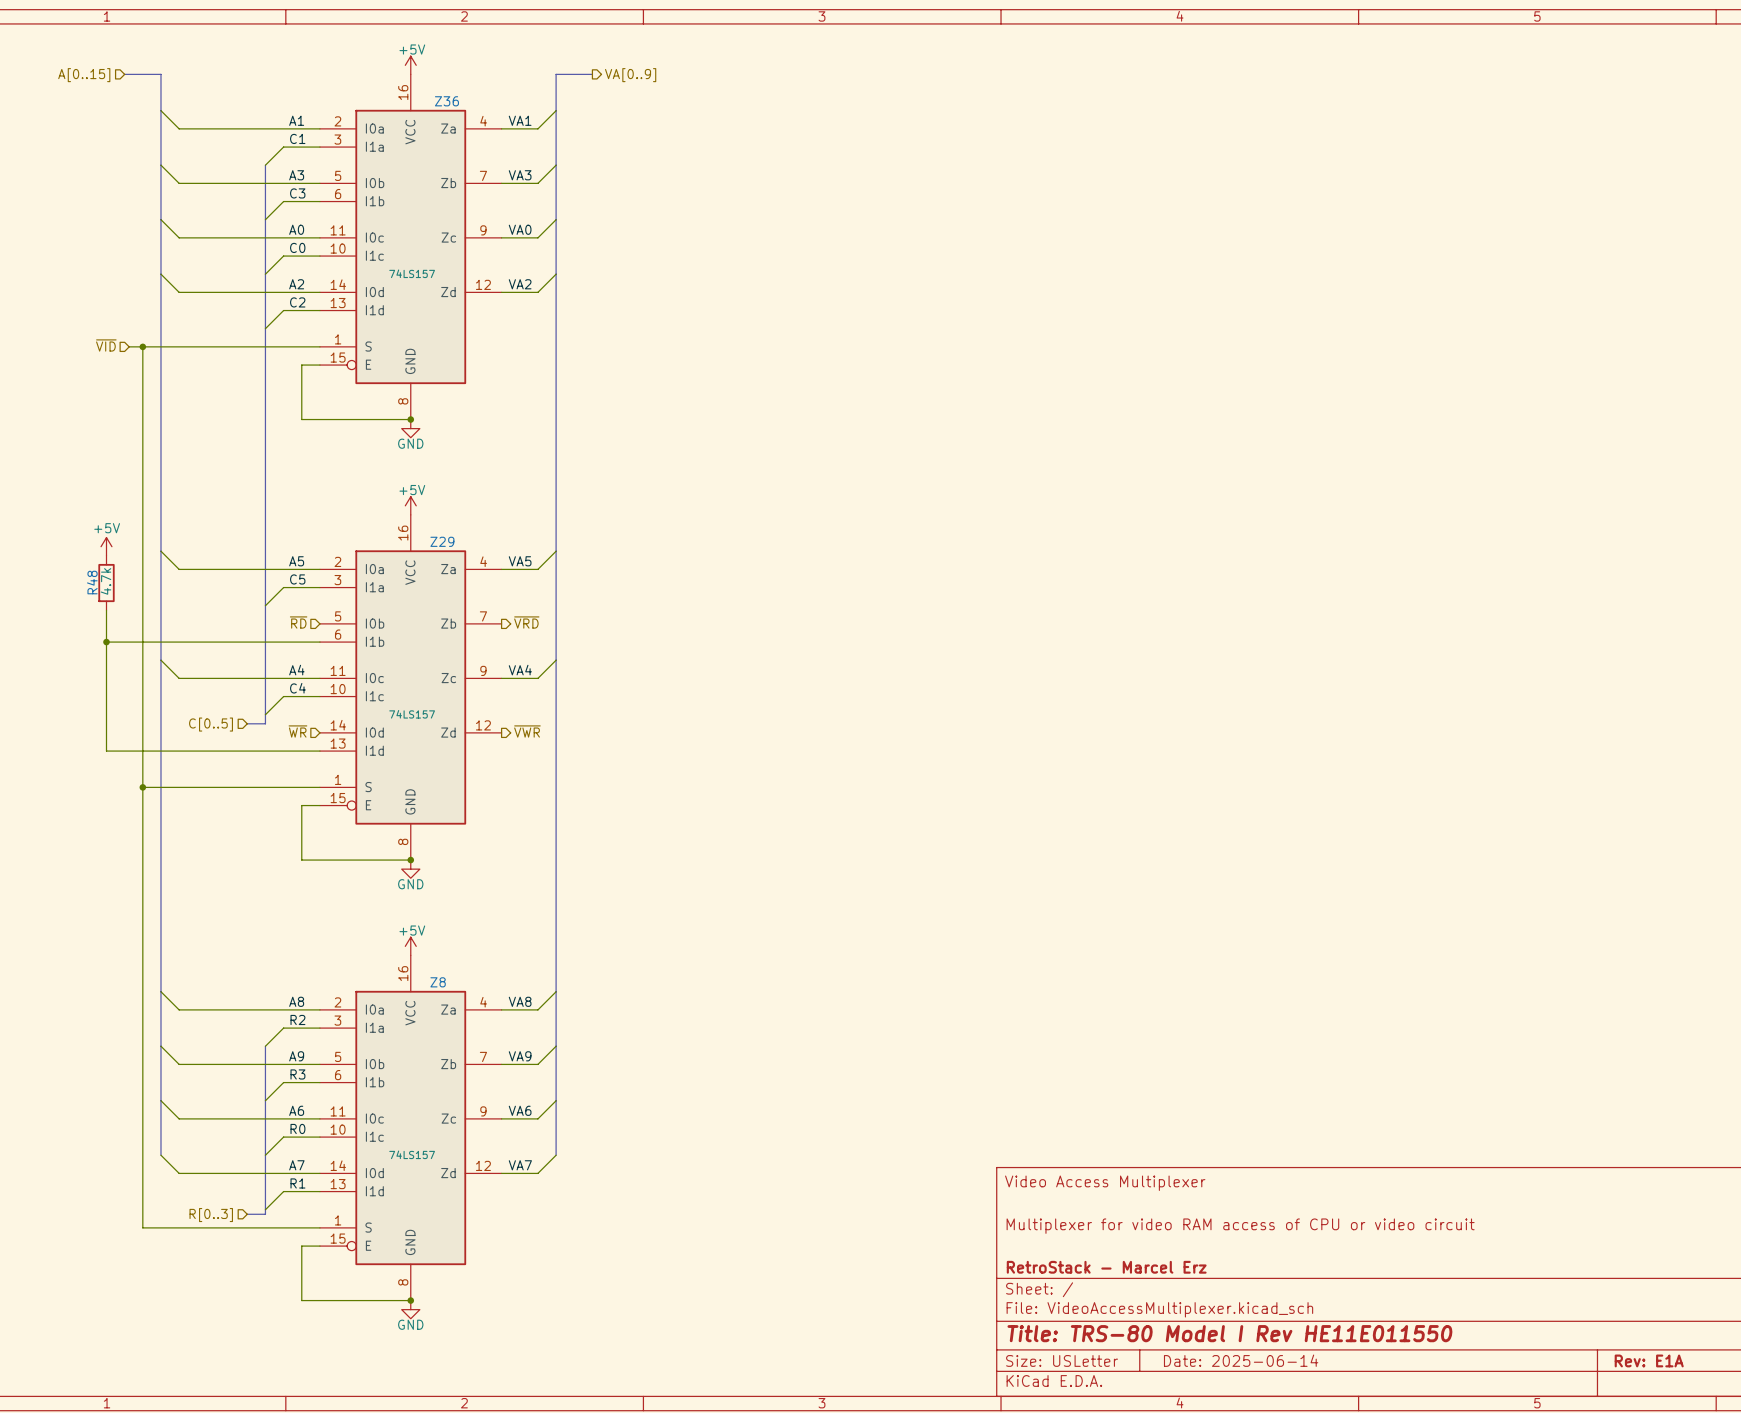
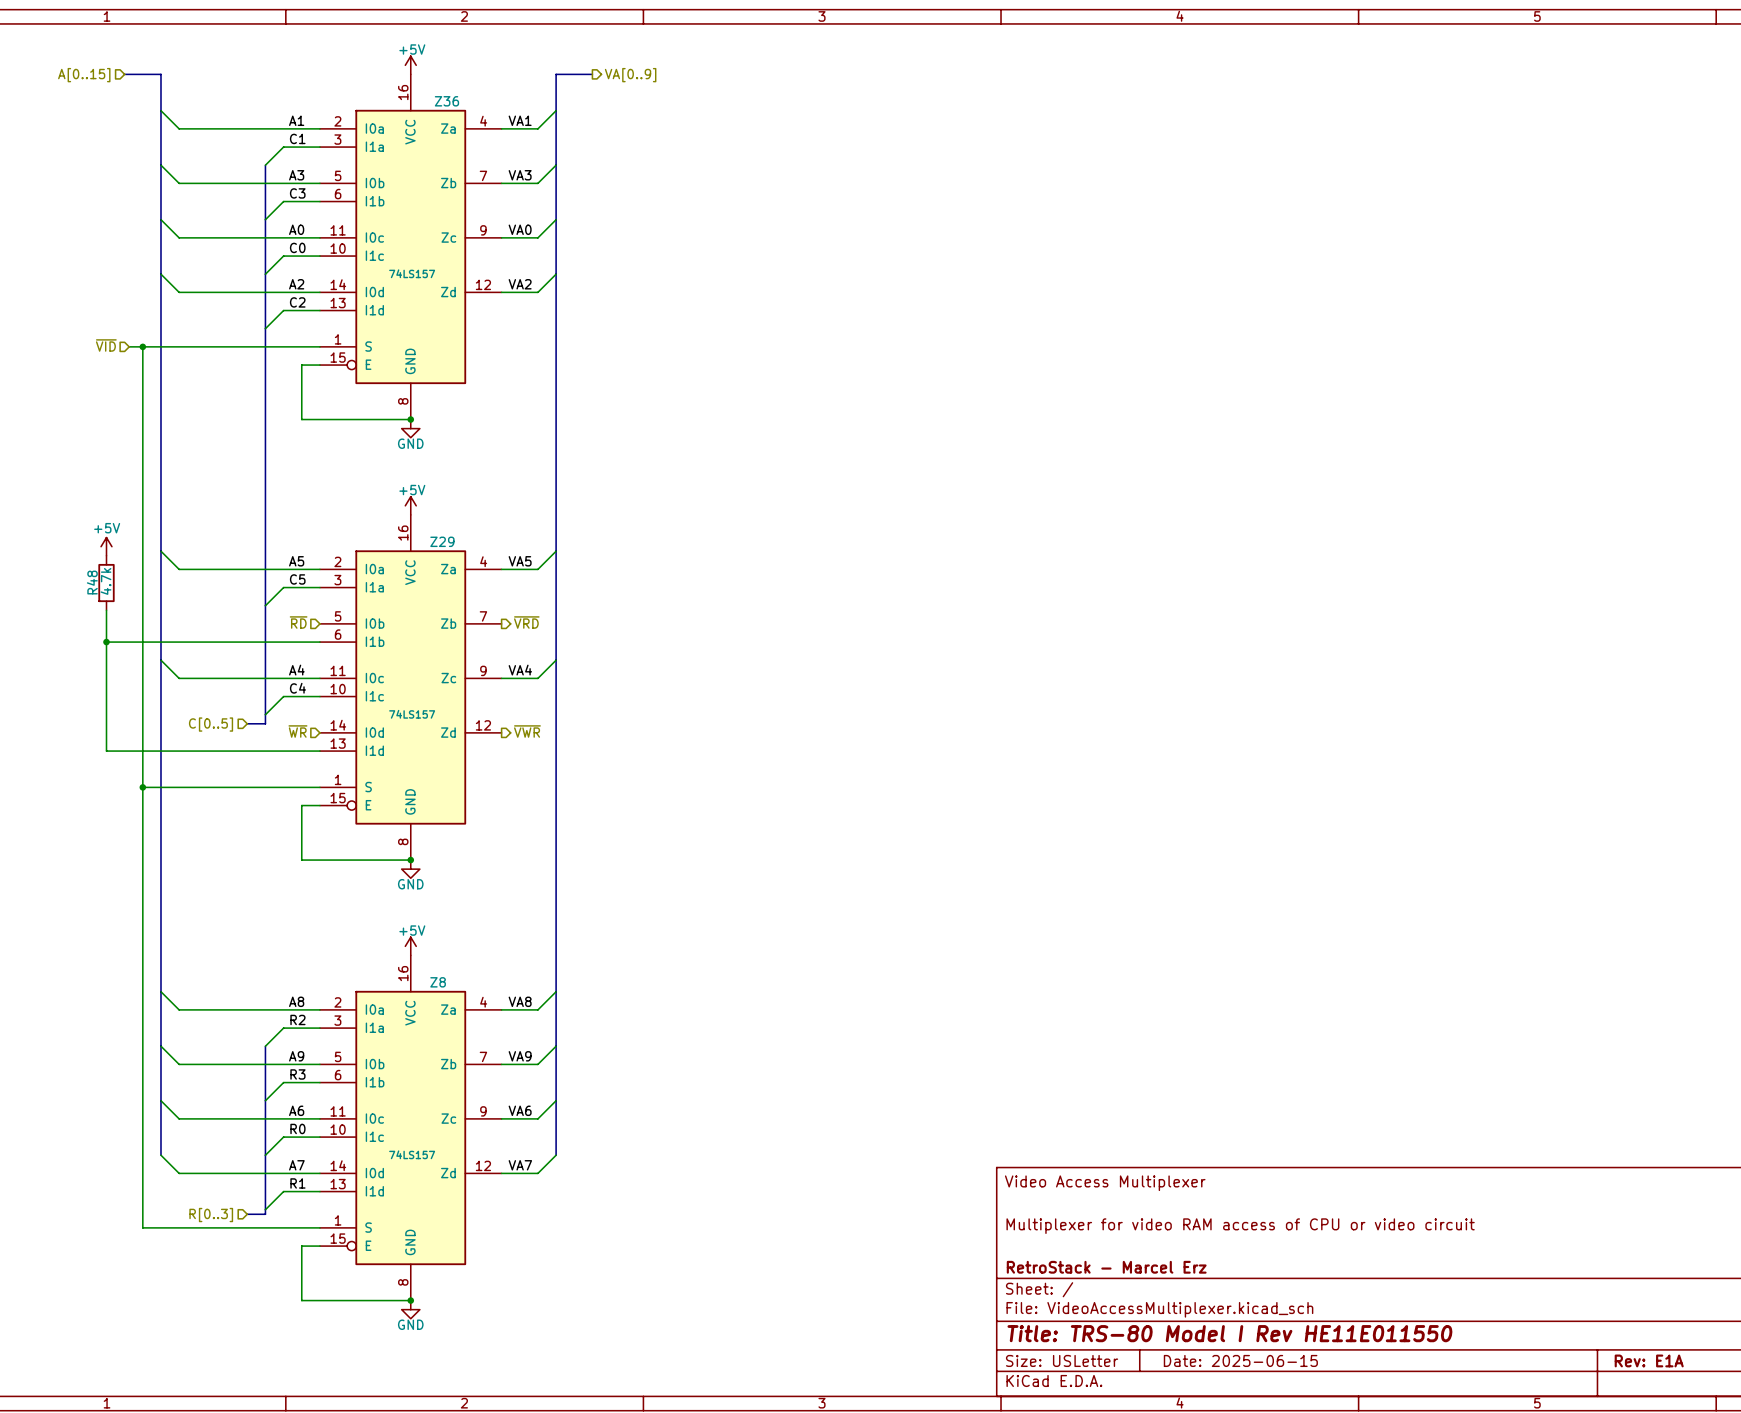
title block: Date: 2025-06-14 (1241, 1360) -> Date: 2025-06-15 (1240, 1360)

